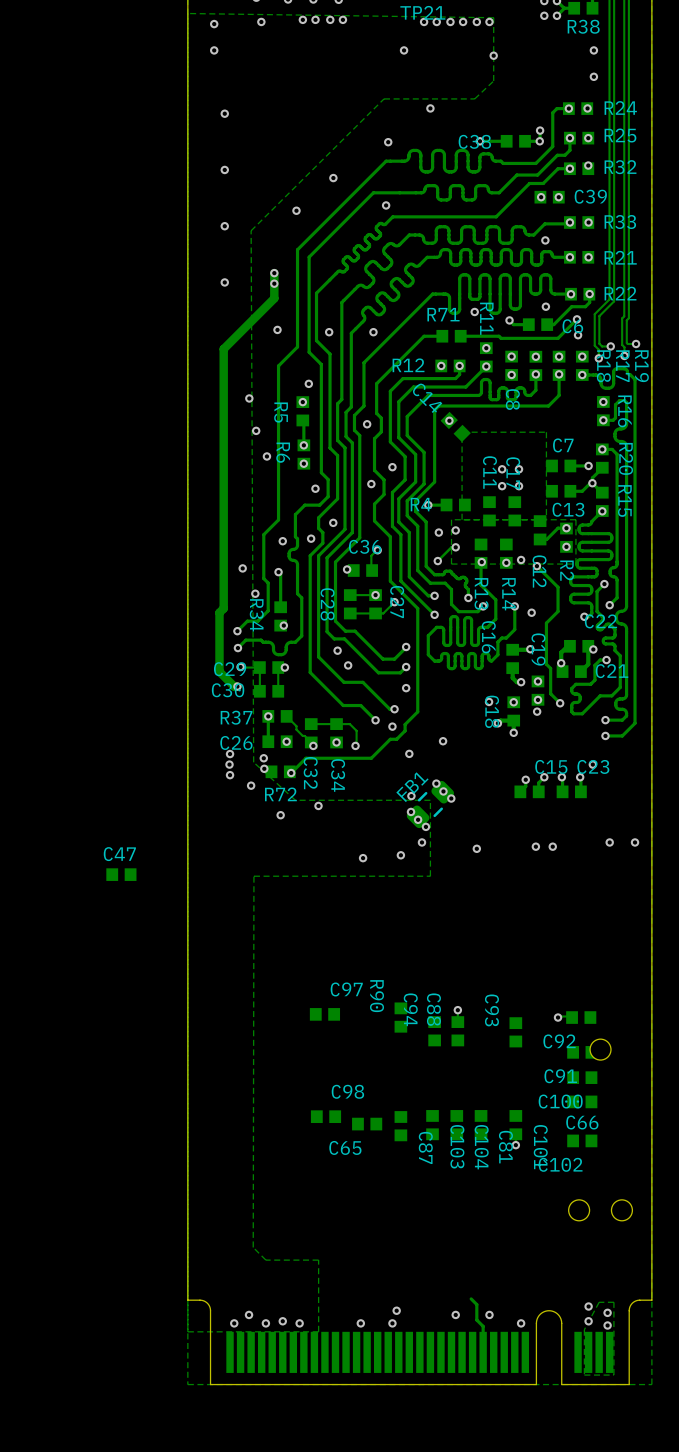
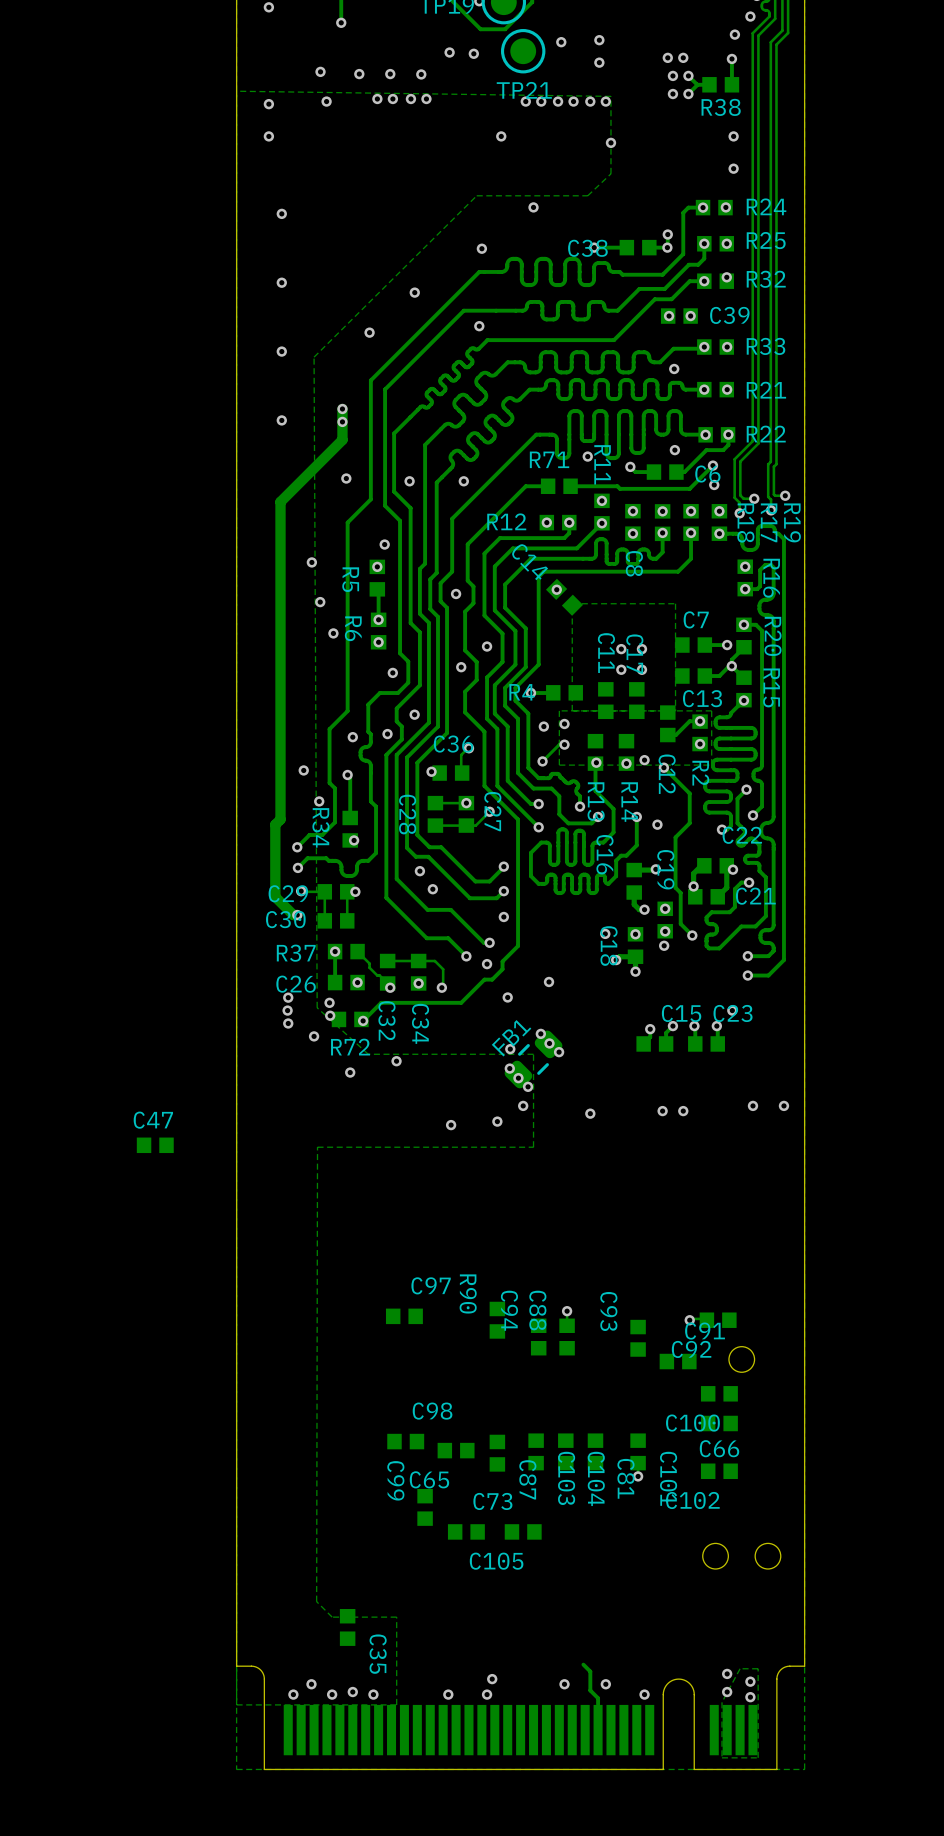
C91 position: (582, 1052) -> (678, 1361)
C91 name position: C91 (560, 1076) -> C91 (705, 1331)
C99: none -> (425, 1507)
C73: none -> (466, 1531)
C105: none -> (523, 1531)
C35: none -> (347, 1627)

